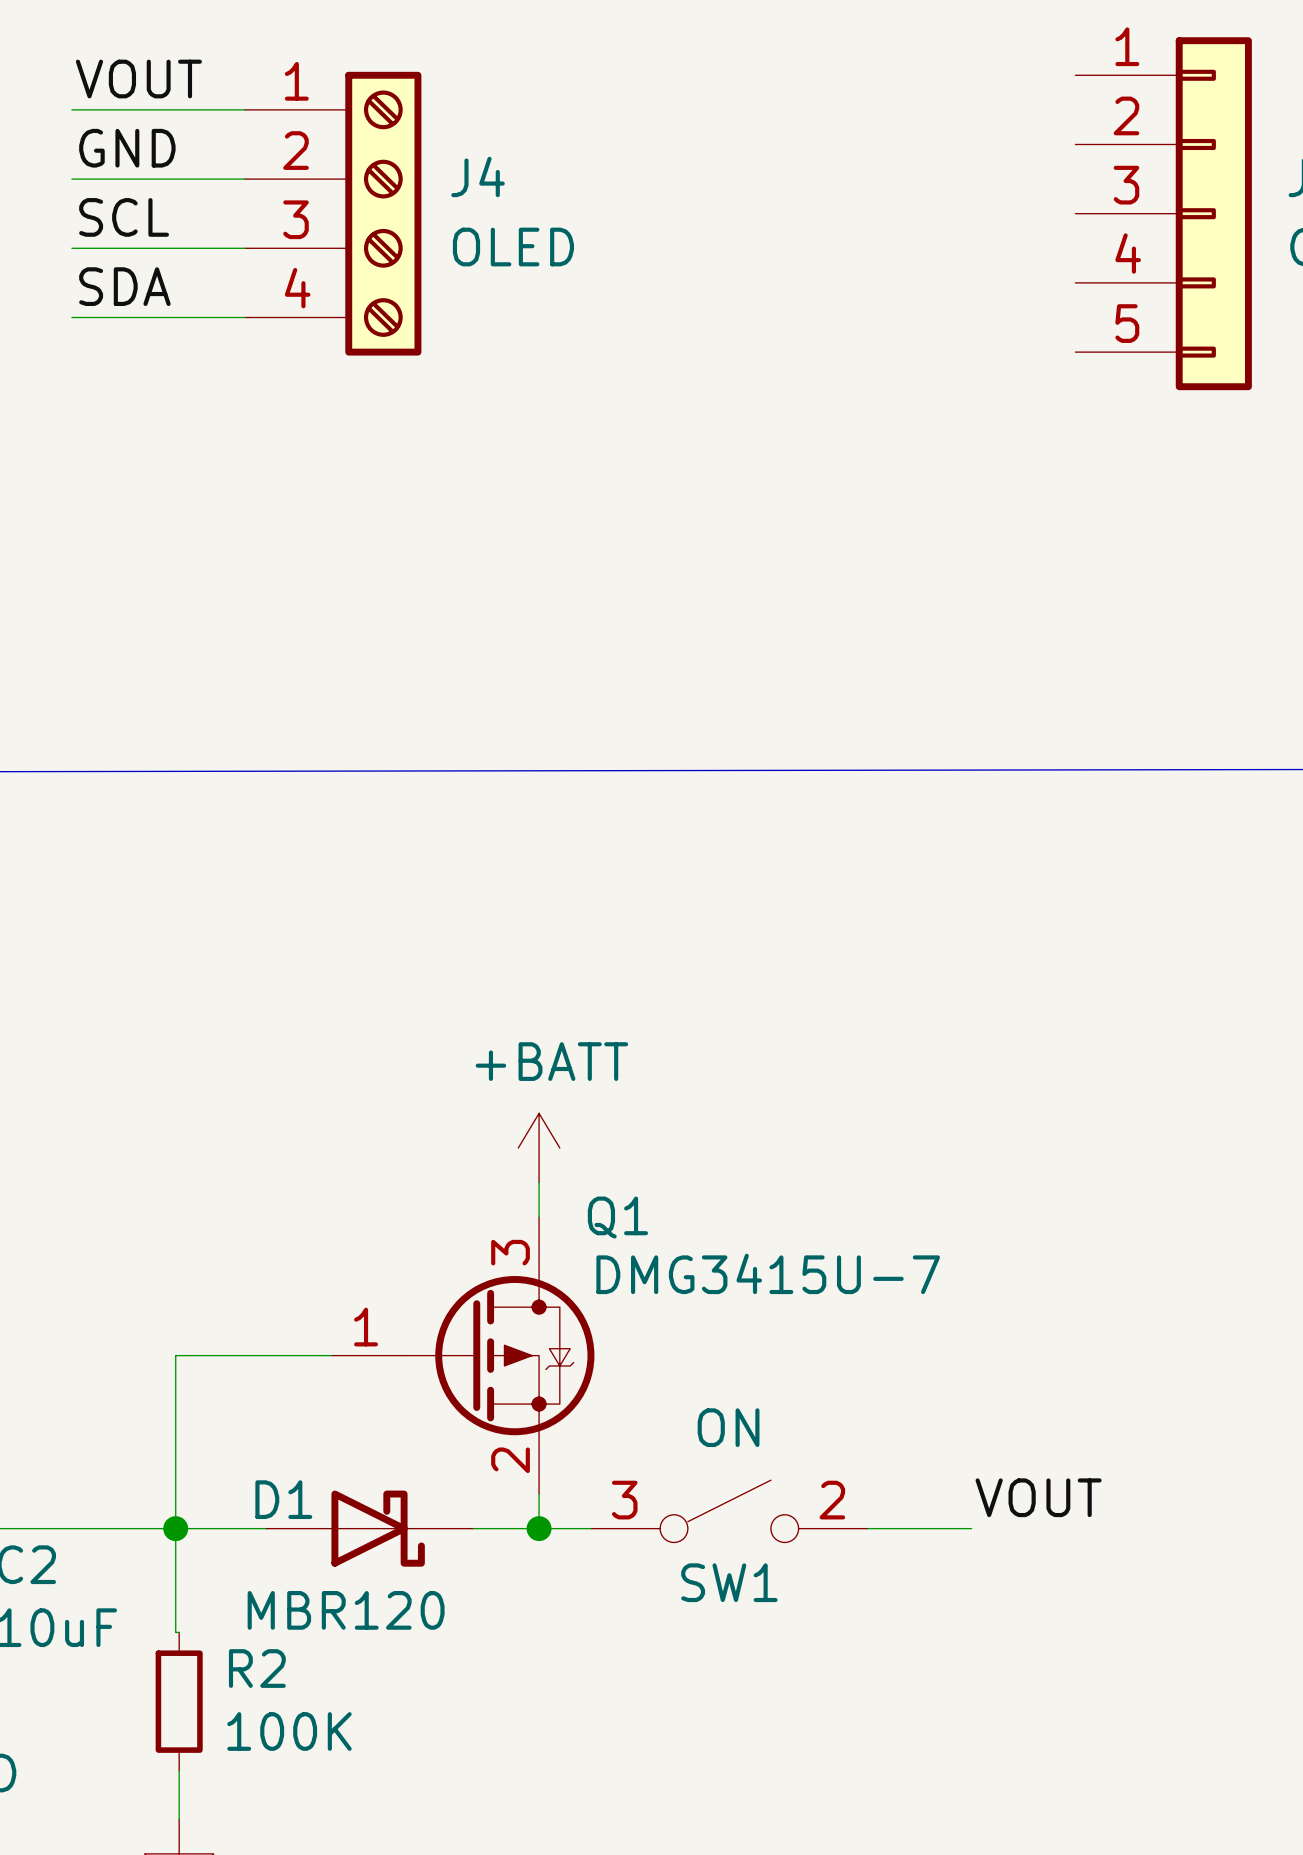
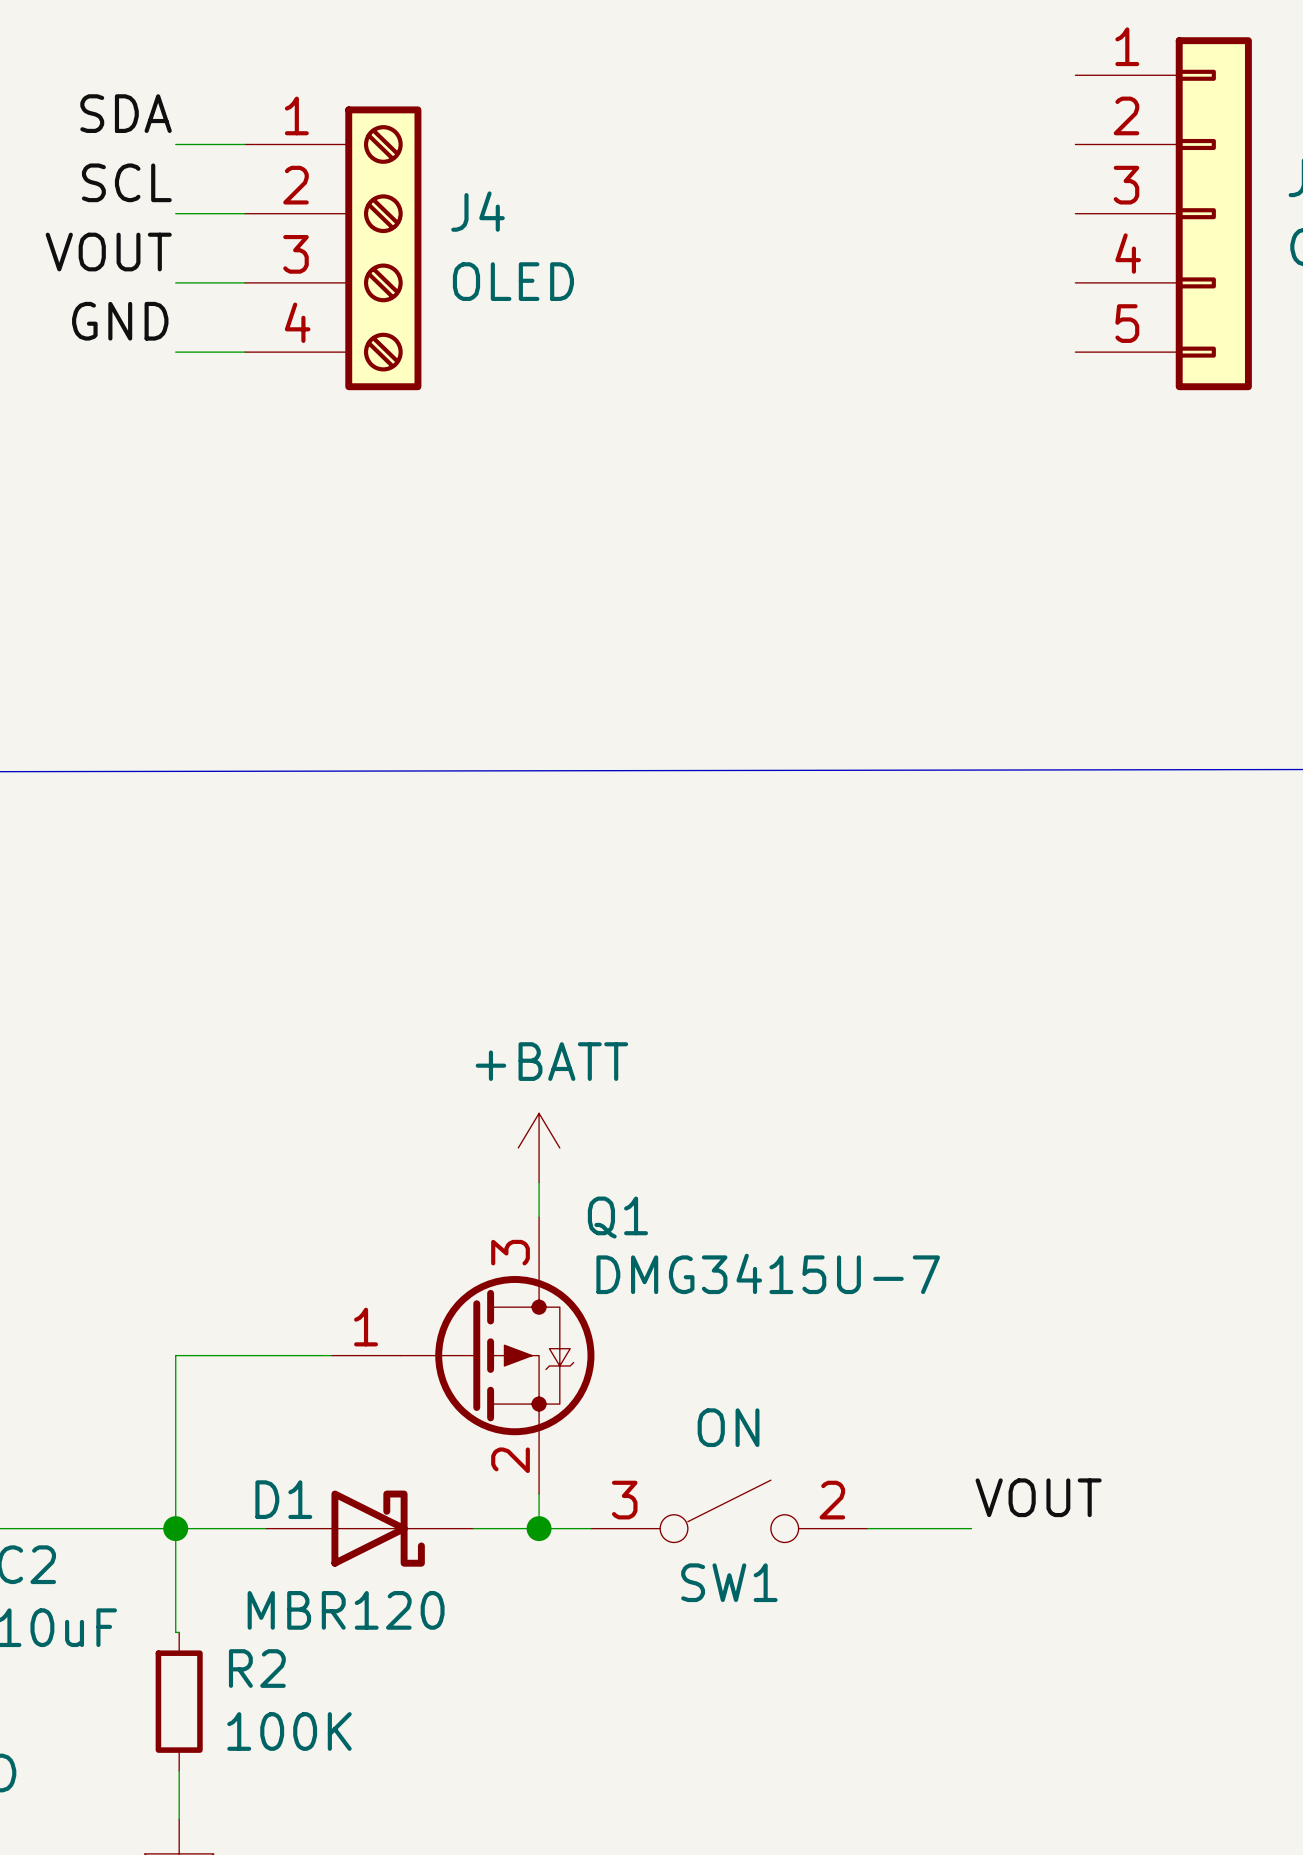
label position: VOUT (138, 79) -> VOUT (108, 252)
wire: (71, 109) (244, 109) -> none
wire: none -> (175, 144) (244, 144)
label position: GND (127, 148) -> GND (120, 321)
wire: (71, 179) (244, 179) -> none
wire: none -> (175, 213) (244, 213)
J4 position: (333, 213) -> (333, 248)
label position: SCL (124, 217) -> SCL (126, 182)
wire: (71, 248) (244, 248) -> none
wire: none -> (175, 282) (244, 282)
label position: SDA (124, 286) -> SDA (126, 113)
wire: (71, 317) (244, 317) -> none
wire: none -> (175, 352) (244, 352)

